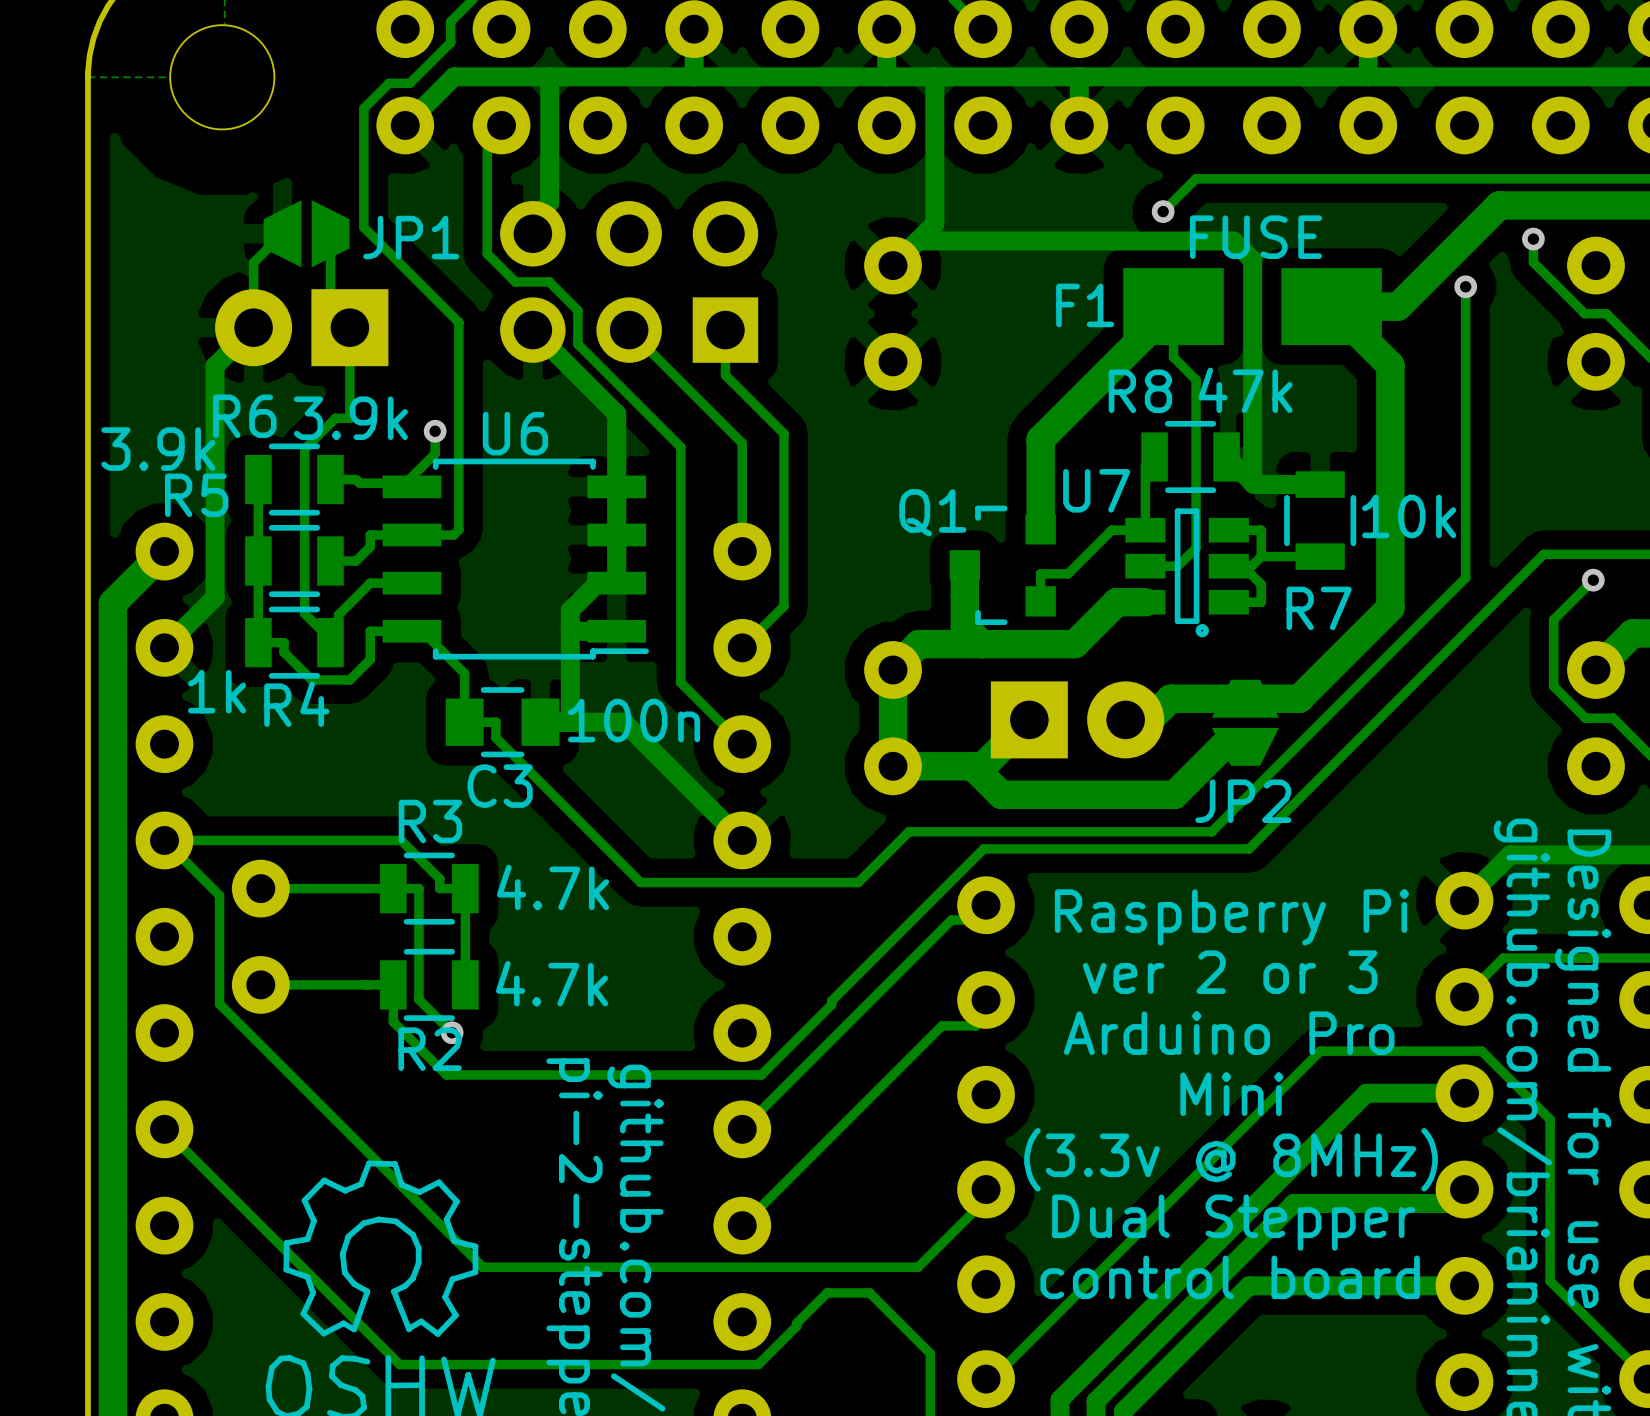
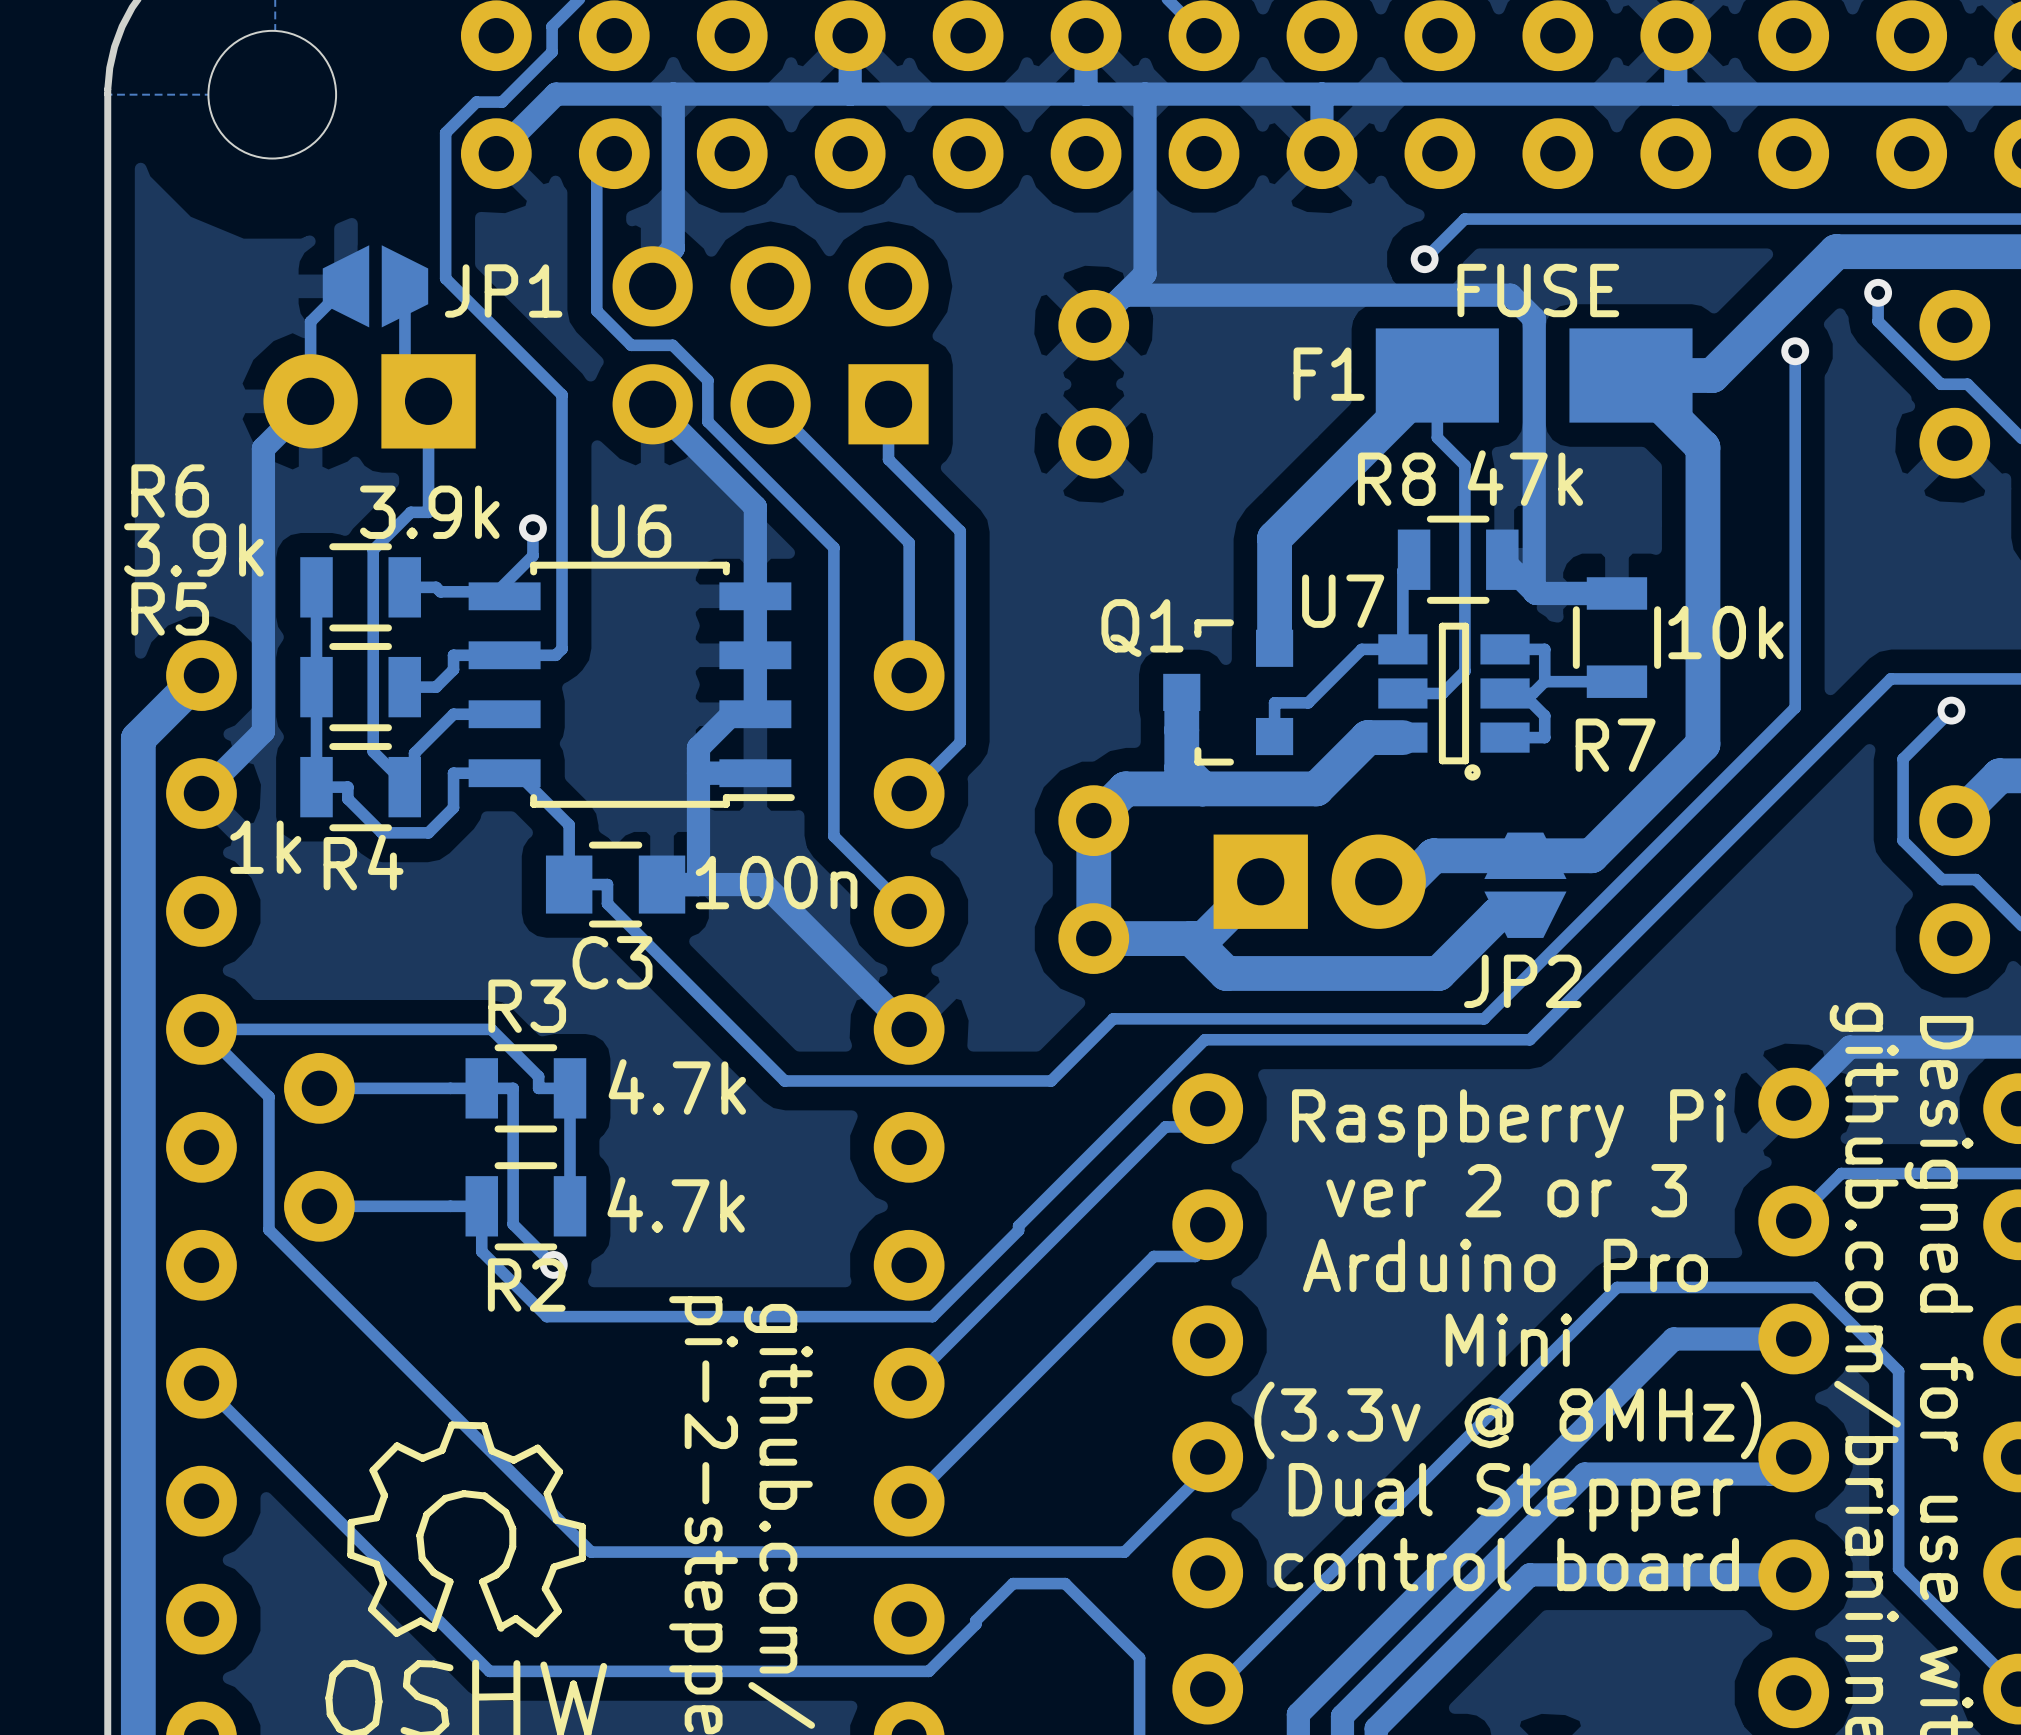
R6 name position: R6 (244, 416) -> R6 (170, 491)
R5 name position: R5 (196, 495) -> R5 (170, 608)

